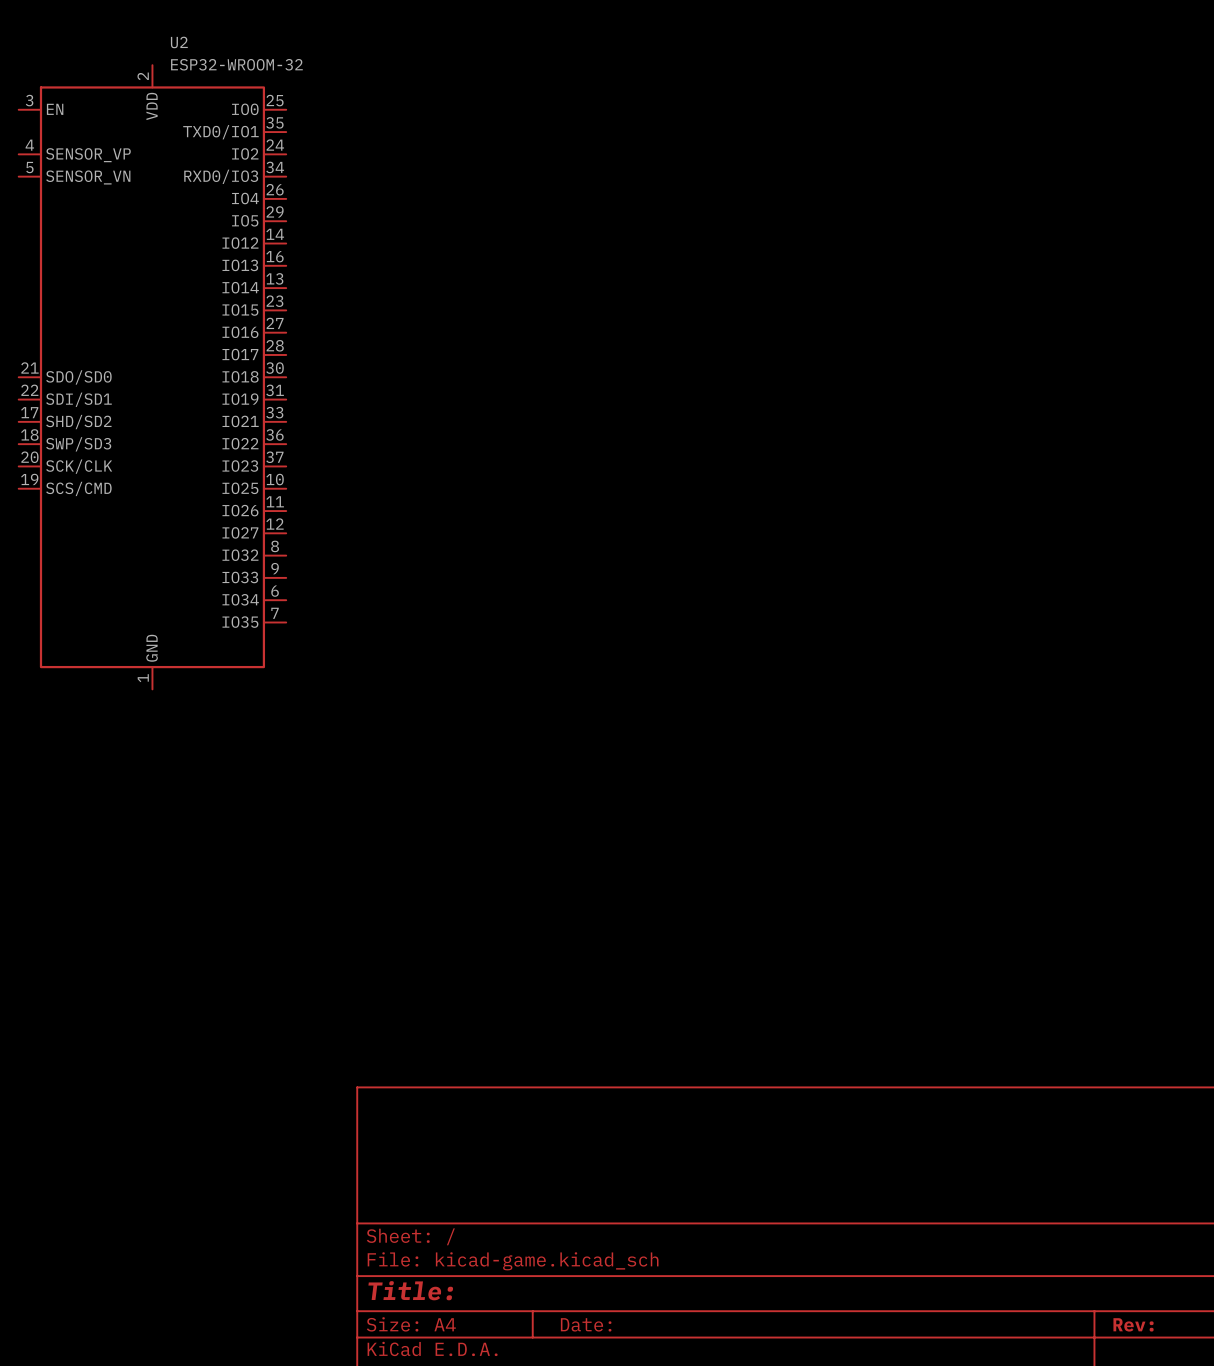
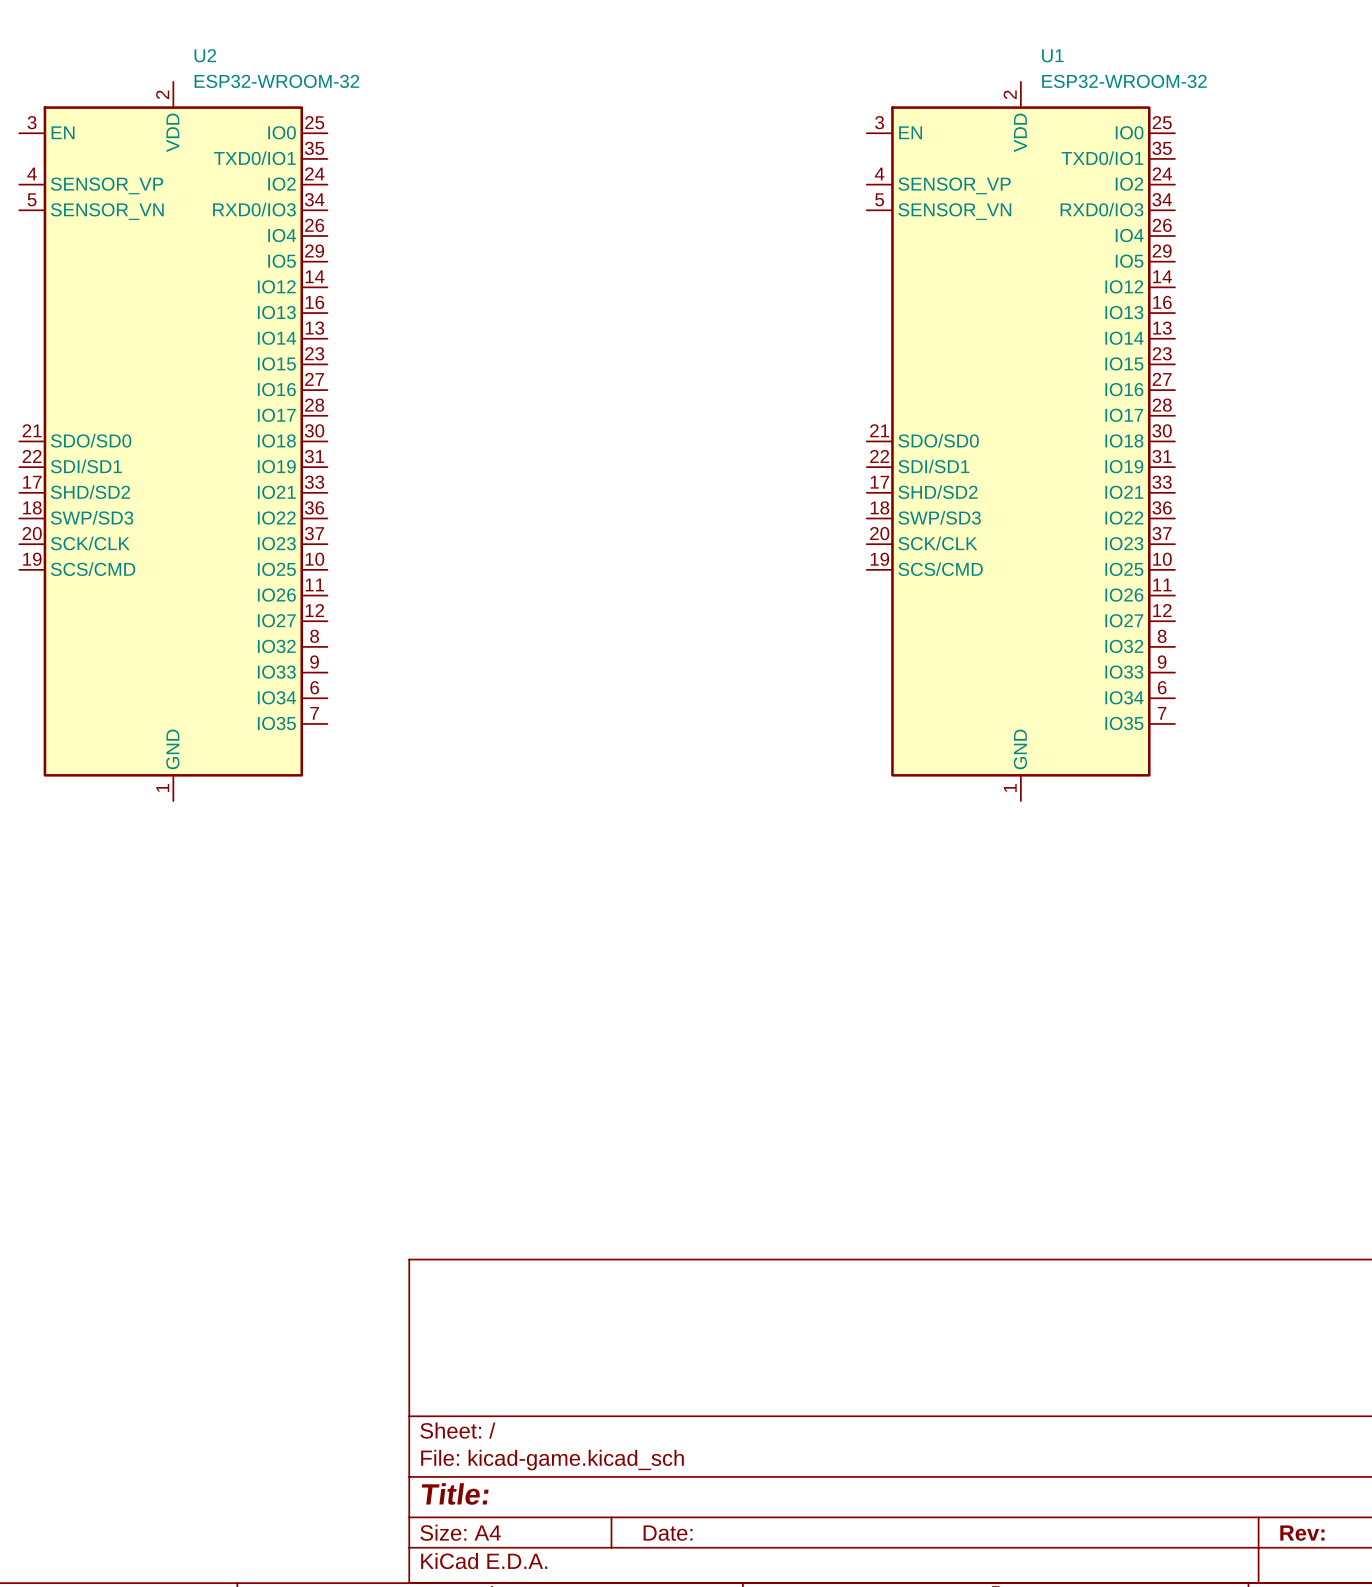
U1: none -> ESP32-WROOM-32 (1020, 441)

